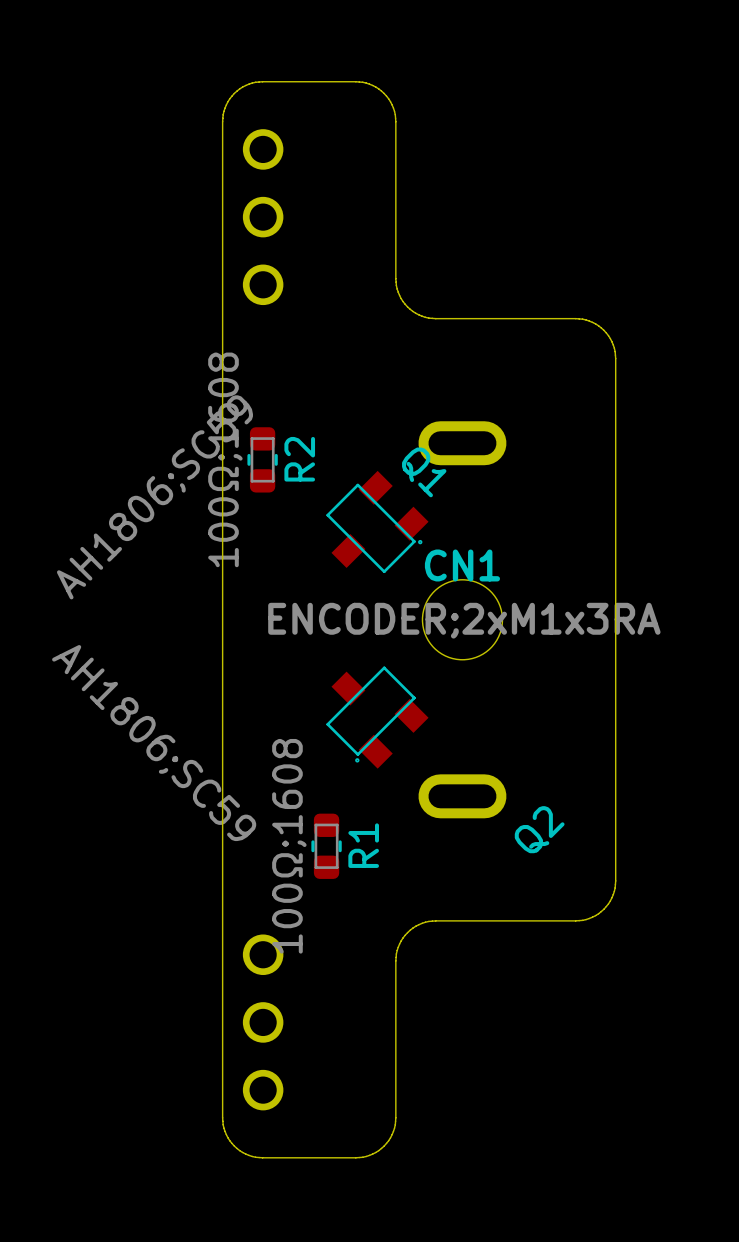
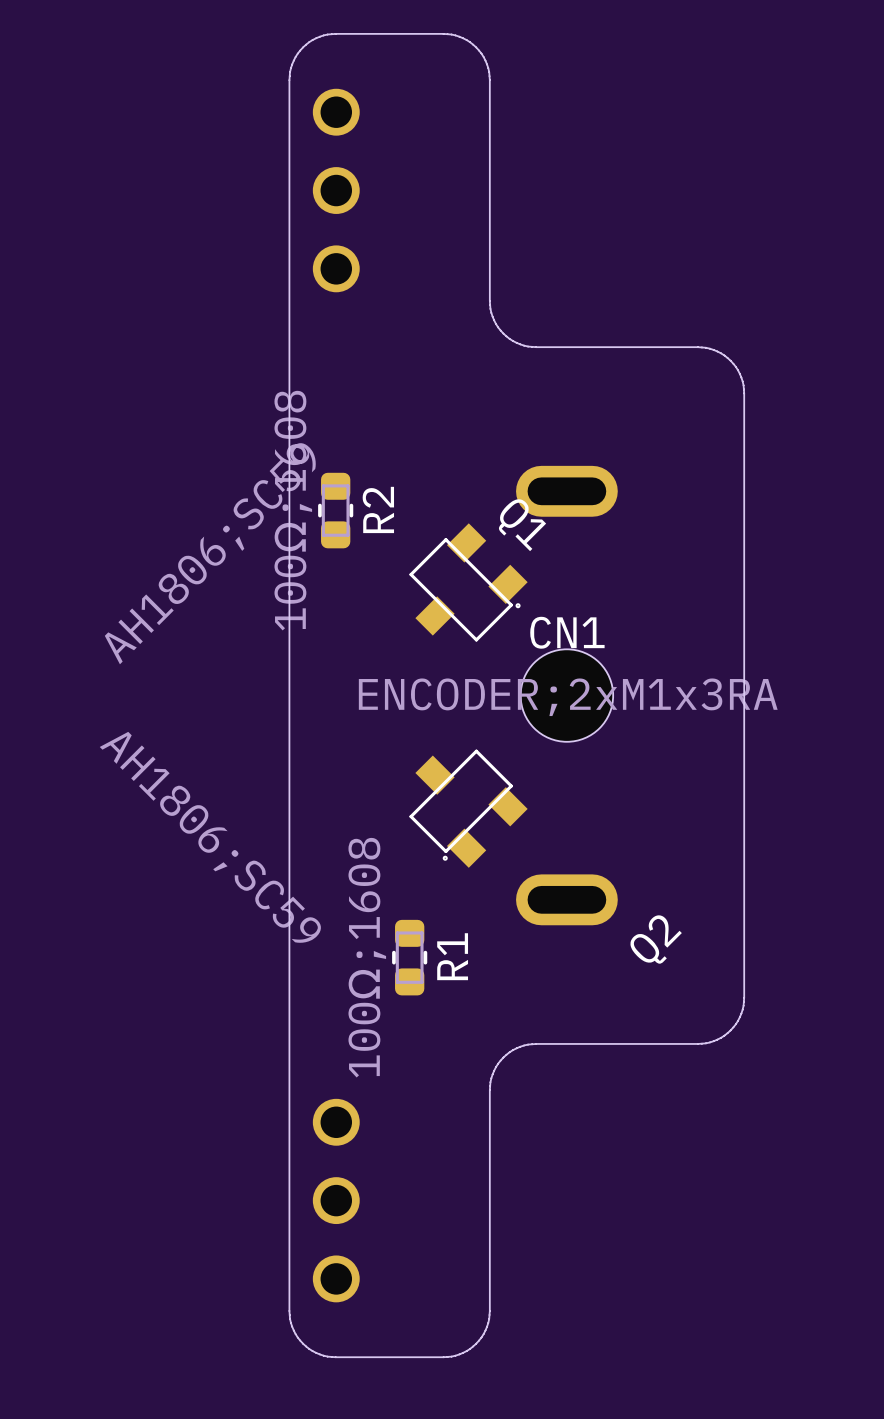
board edge: (222, 121) (225, 108) (234, 93) (249, 84) (262, 81) (366, 83) (378, 88) (388, 98) (394, 111) (395, 121) -> (289, 119) (290, 72) (295, 57) (302, 47) (312, 40) (323, 35) (335, 33) (443, 33) (455, 35) (466, 40) (481, 53) (488, 68) (489, 119)
CN1 footprint: [242, 129, 507, 1111] -> [312, 88, 618, 1303]
board edge: (222, 1117) (225, 1131) (234, 1146) (249, 1155) (262, 1157) (366, 1156) (378, 1150) (388, 1140) (394, 1128) (395, 1117) -> (289, 1271) (290, 1318) (295, 1334) (302, 1343) (312, 1351) (323, 1355) (335, 1357) (443, 1357) (455, 1355) (466, 1351) (481, 1337) (488, 1323) (489, 1271)

